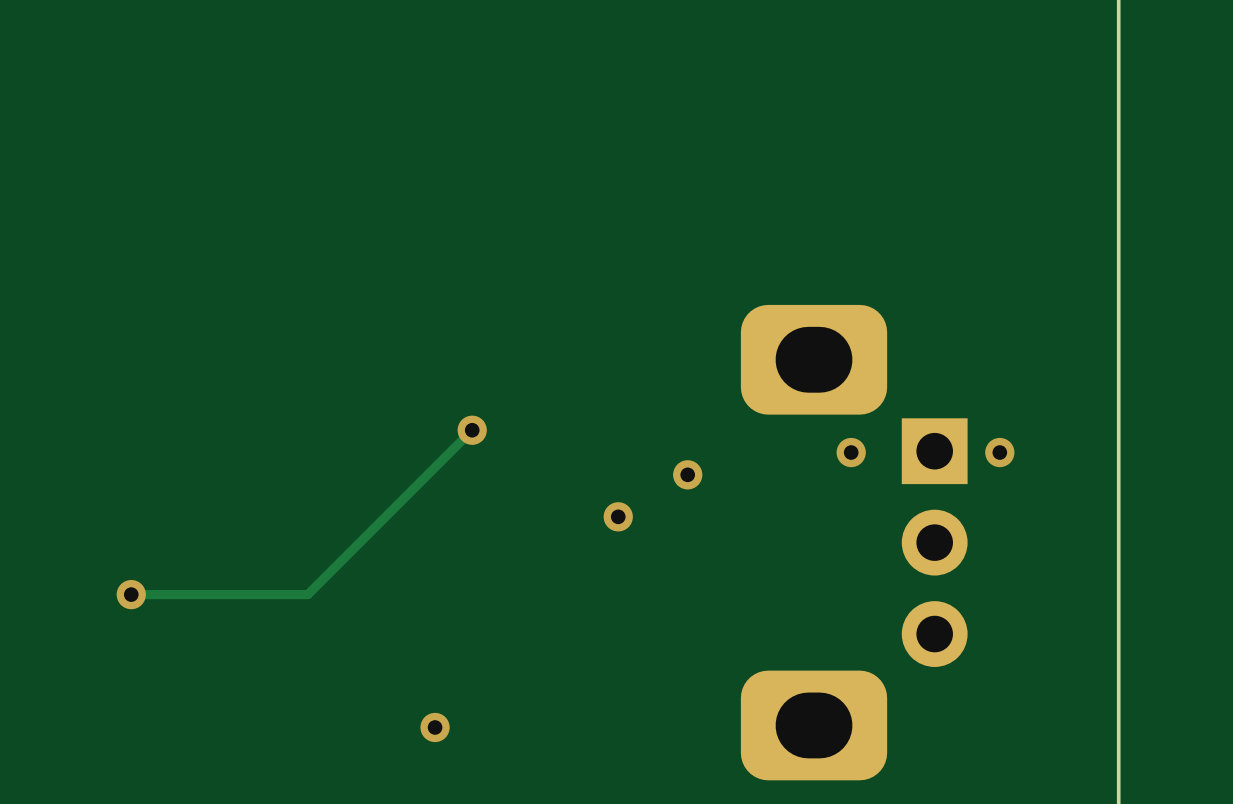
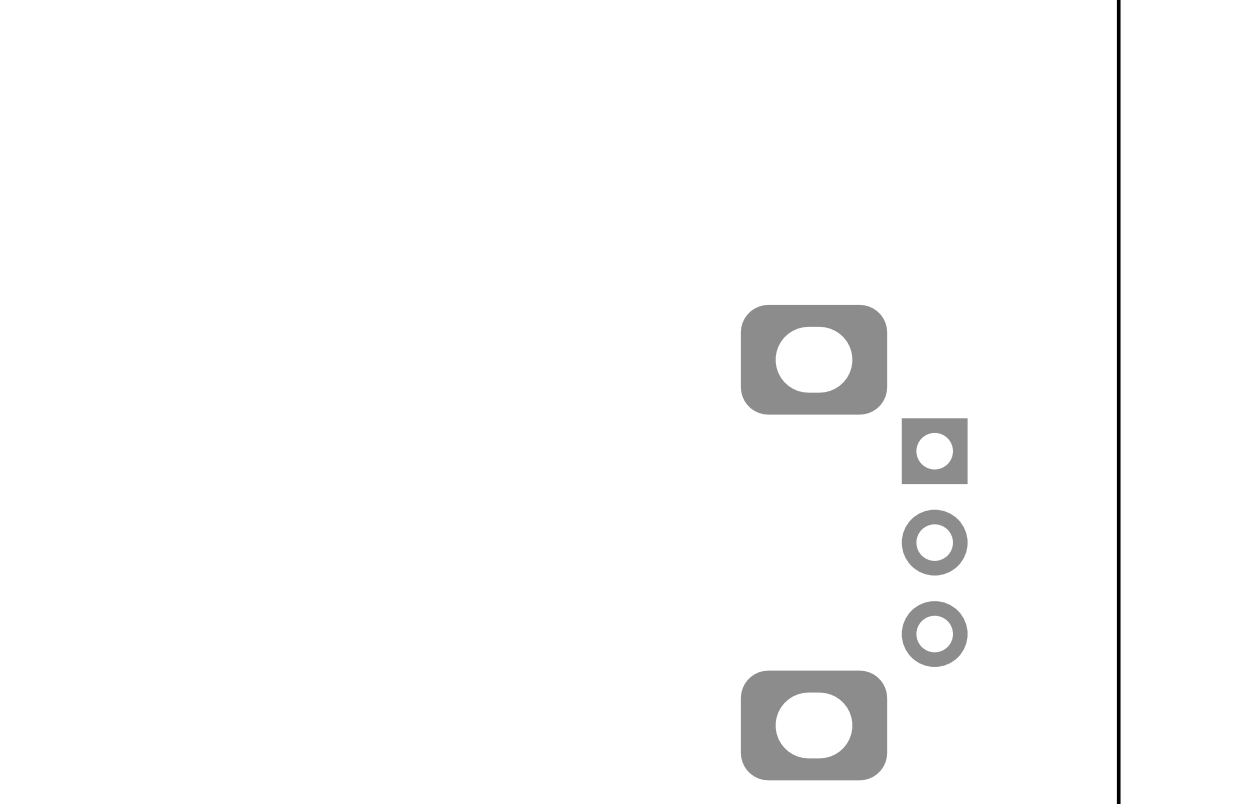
track: (472, 430) (307, 594) (131, 594) -> none
via: (472, 430) -> none
via: (851, 452) -> none
via: (999, 452) -> none
via: (687, 474) -> none
via: (618, 516) -> none
via: (131, 594) -> none
via: (435, 727) -> none

